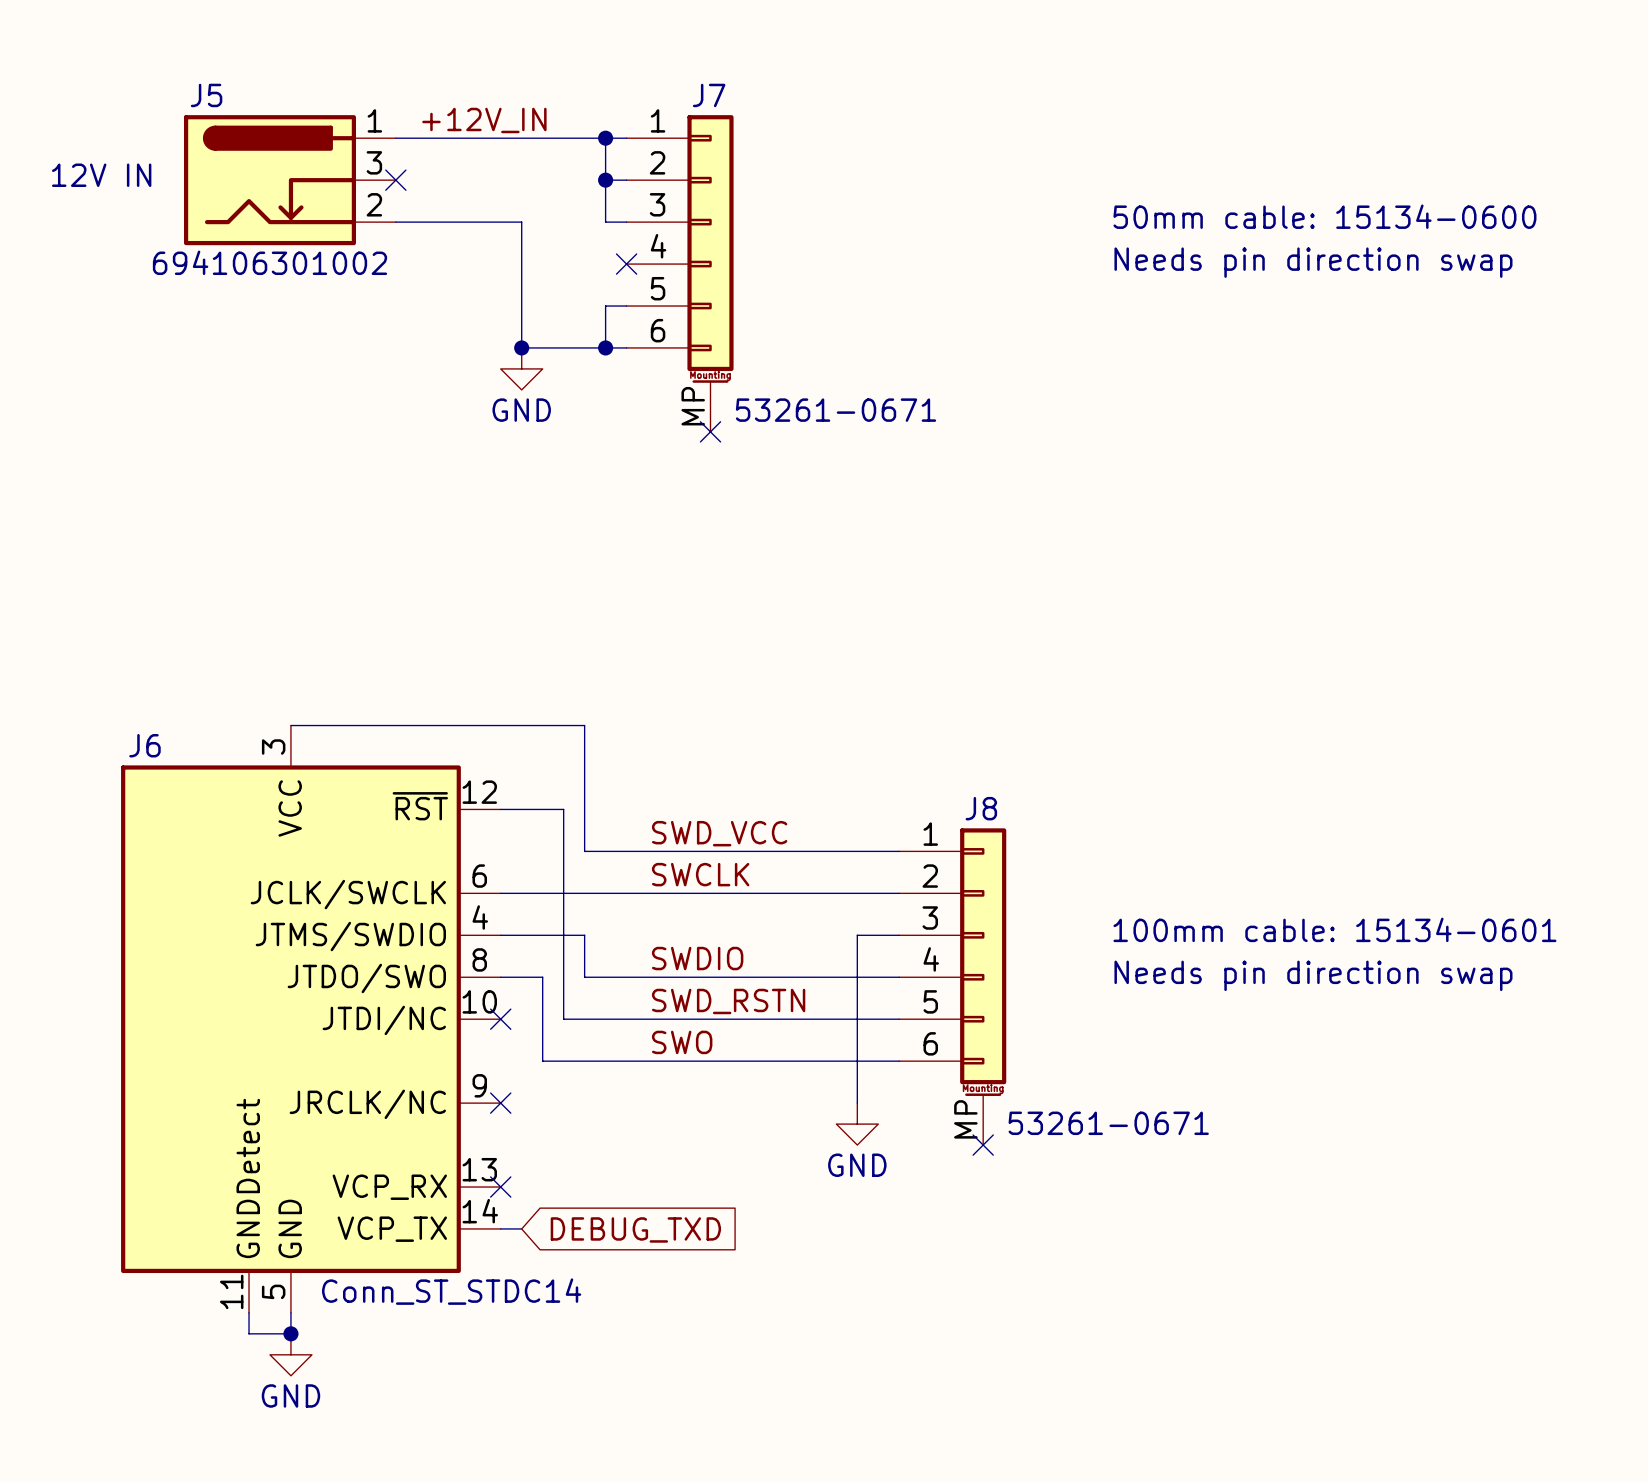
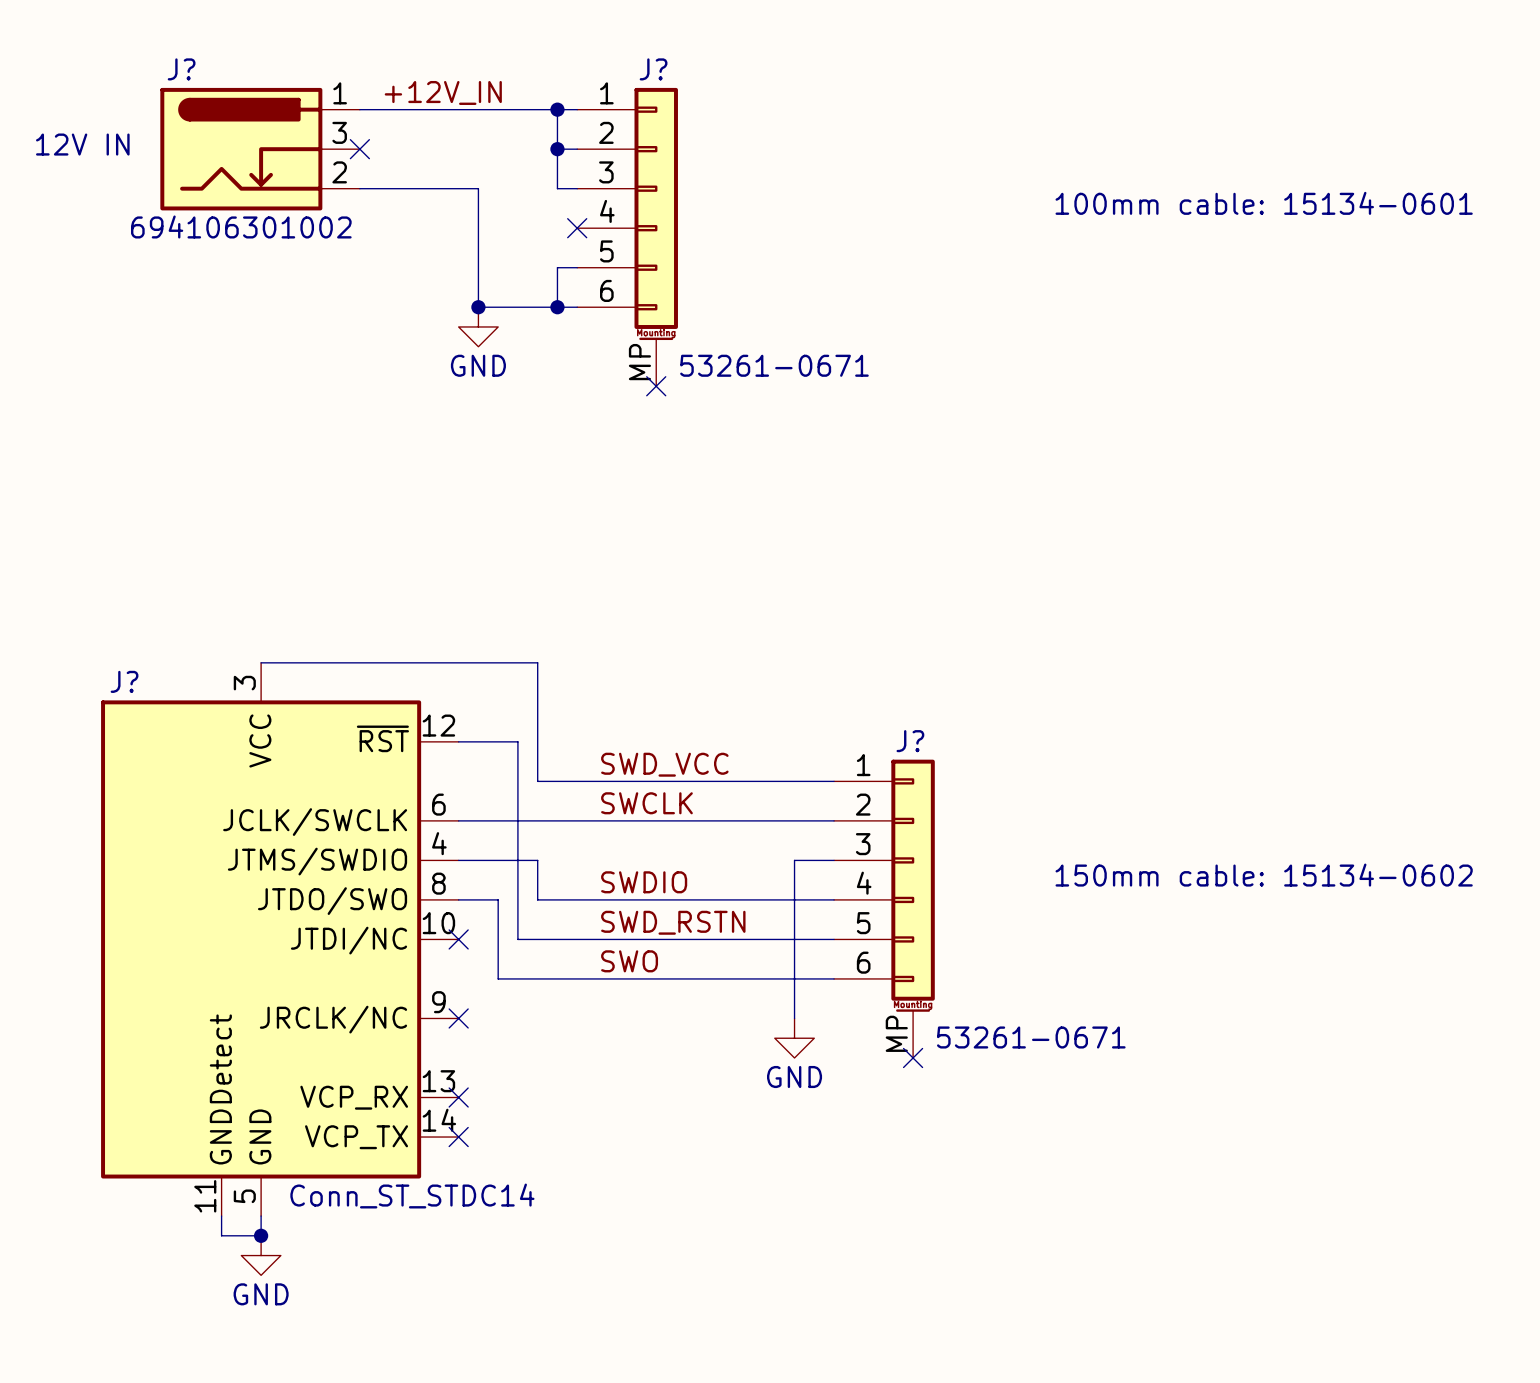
J5 name: J5 (206, 95) -> J? (181, 69)
J7 name: J7 (709, 95) -> J? (653, 69)
text: 50mm cable: 15134-0600 (1324, 216) -> 100mm cable: 15134-0601 (1264, 203)
text: Needs pin direction swap (1313, 262) -> none
J6 name: J6 (144, 745) -> J? (124, 681)
J8 name: J8 (981, 808) -> J? (910, 741)
text: 100mm cable: 15134-0601 (1334, 929) -> 150mm cable: 15134-0602 (1264, 875)
text: Needs pin direction swap (1313, 975) -> none
wire: (500, 1228) (521, 1228) -> none
no-connect mark: none -> (458, 1137)
global label: DEBUG_TXD (635, 1229) -> none

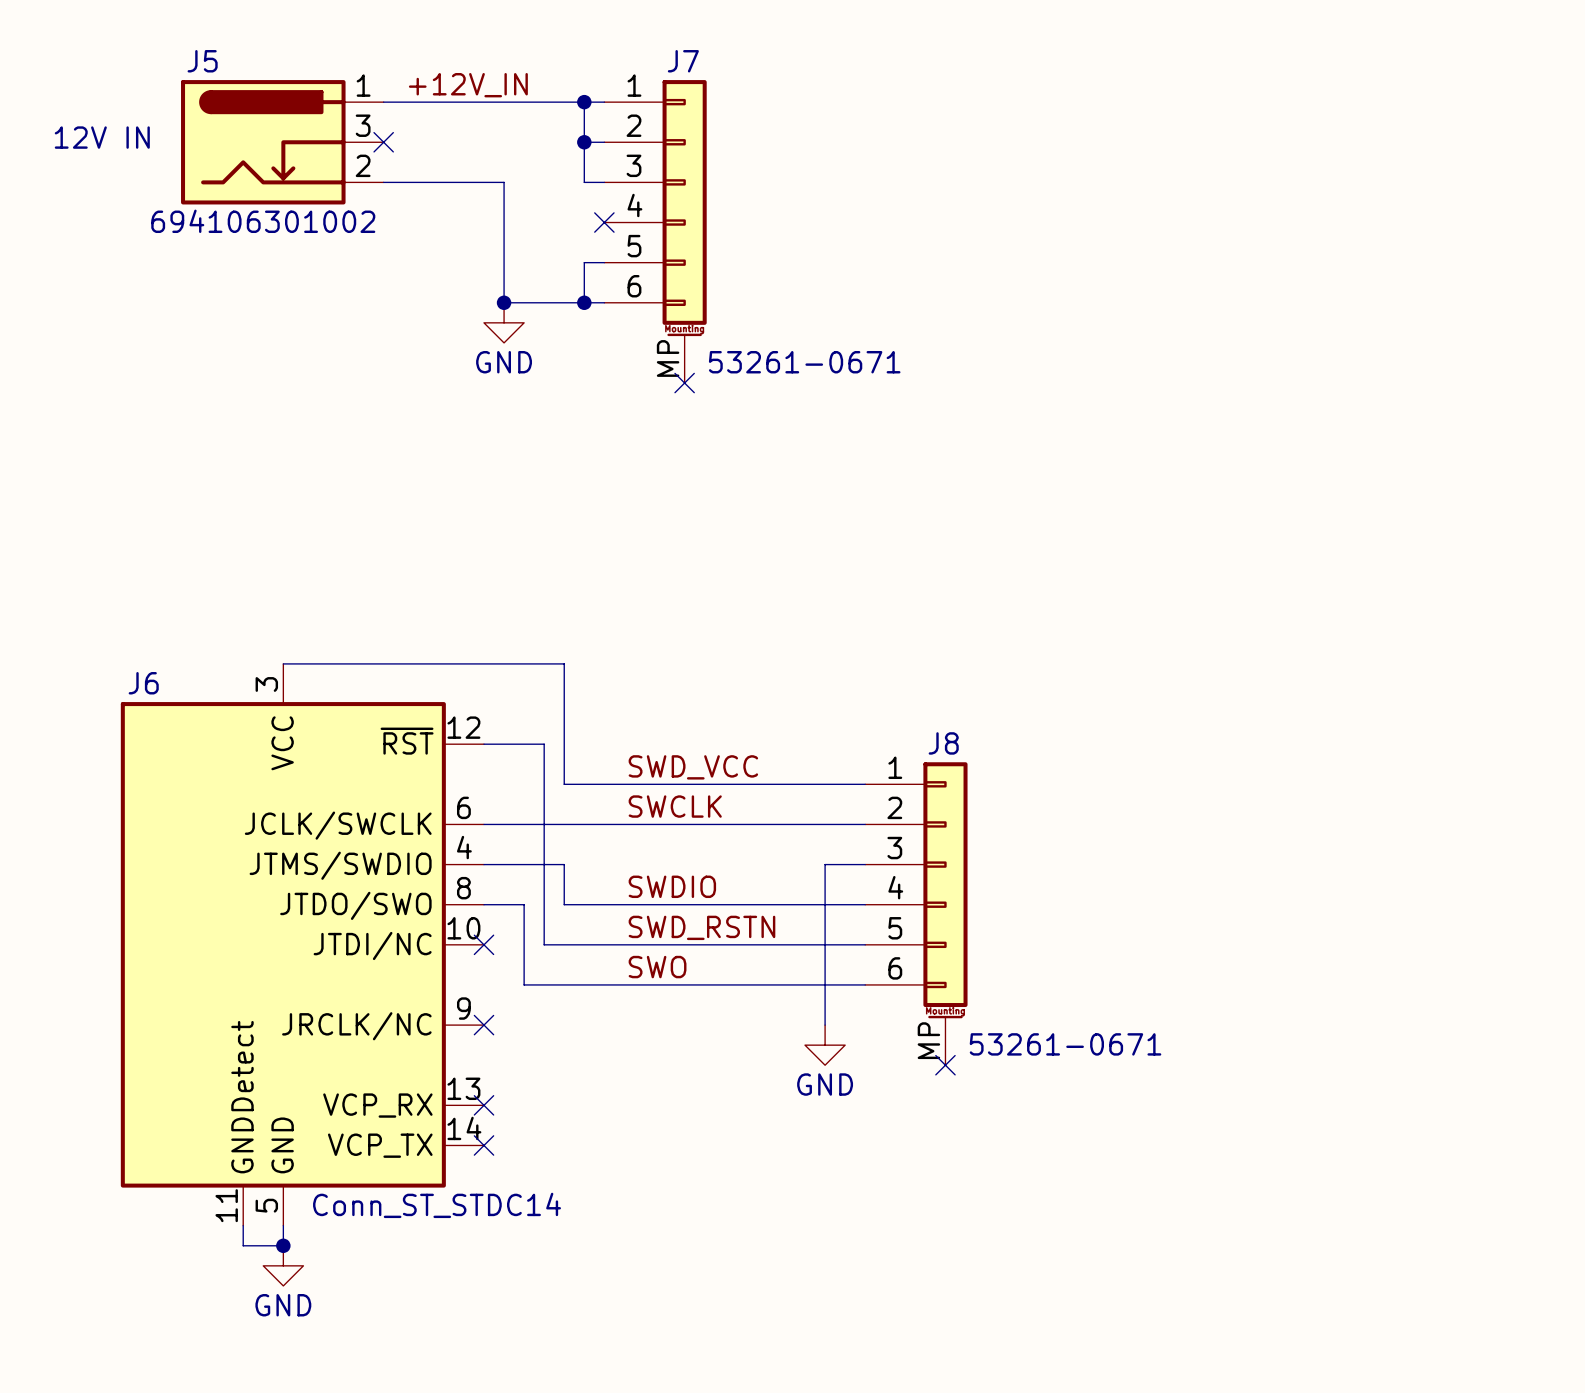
J? name: J? (181, 69) -> J5 (202, 61)
J? name: J? (653, 69) -> J7 (683, 61)
text: 100mm cable: 15134-0601 (1264, 203) -> none
J? name: J? (124, 681) -> J6 (143, 683)
J? name: J? (910, 741) -> J8 (943, 743)
text: 150mm cable: 15134-0602 (1264, 875) -> none

